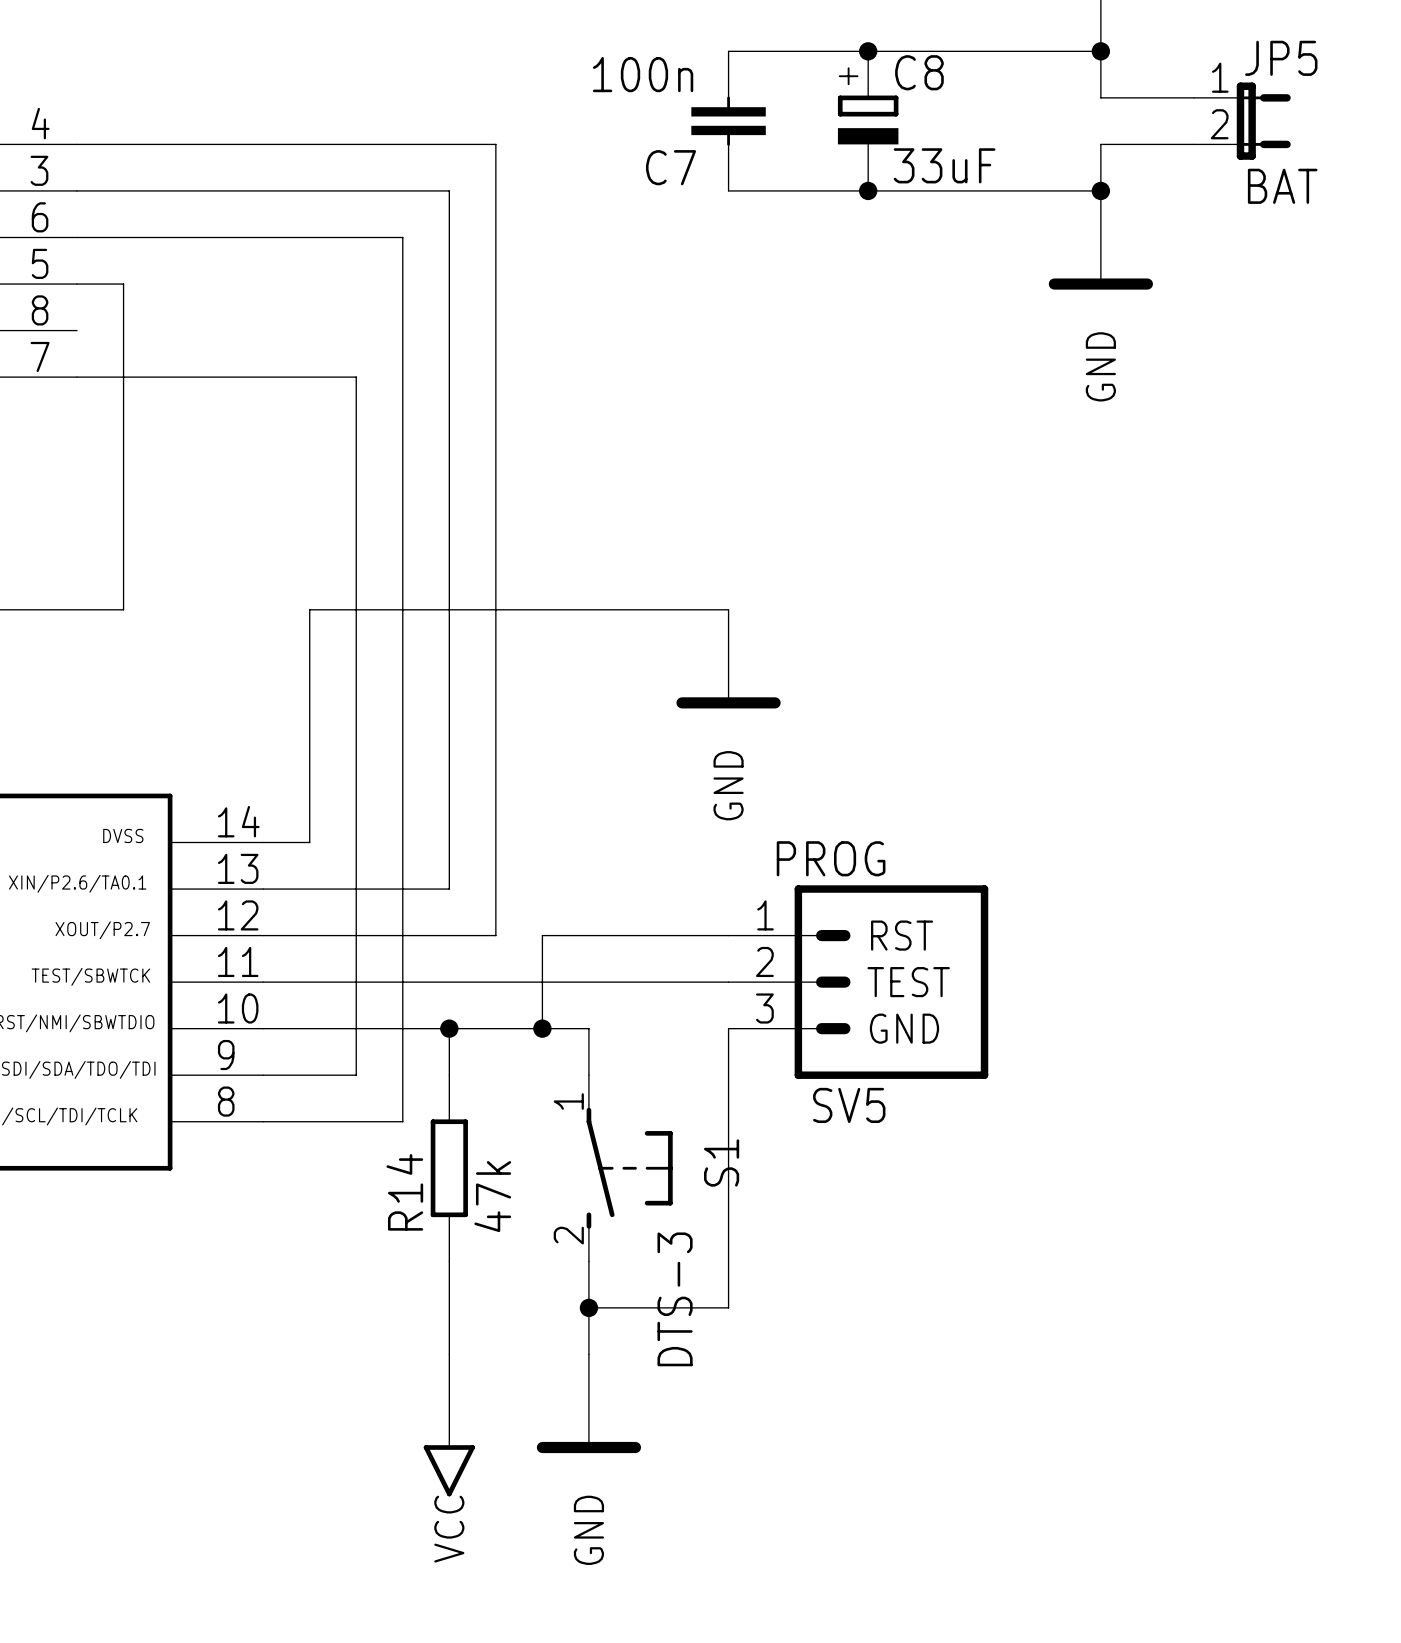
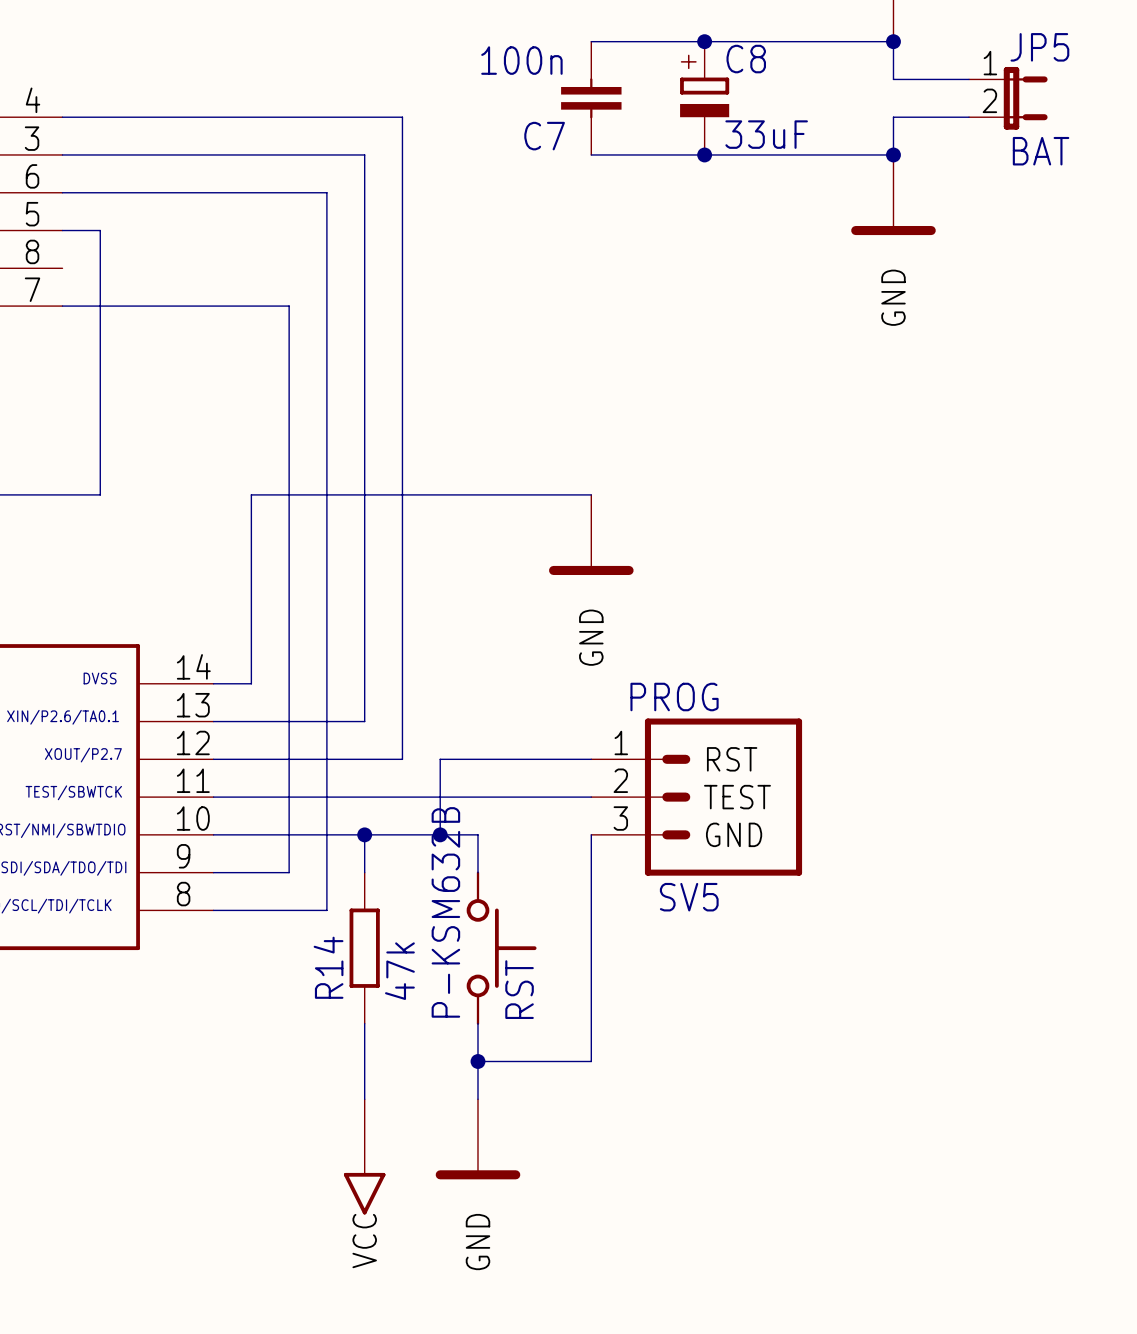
RST: none -> P-KSM632B (501, 948)
S1: DTS-3 (629, 1168) -> none

